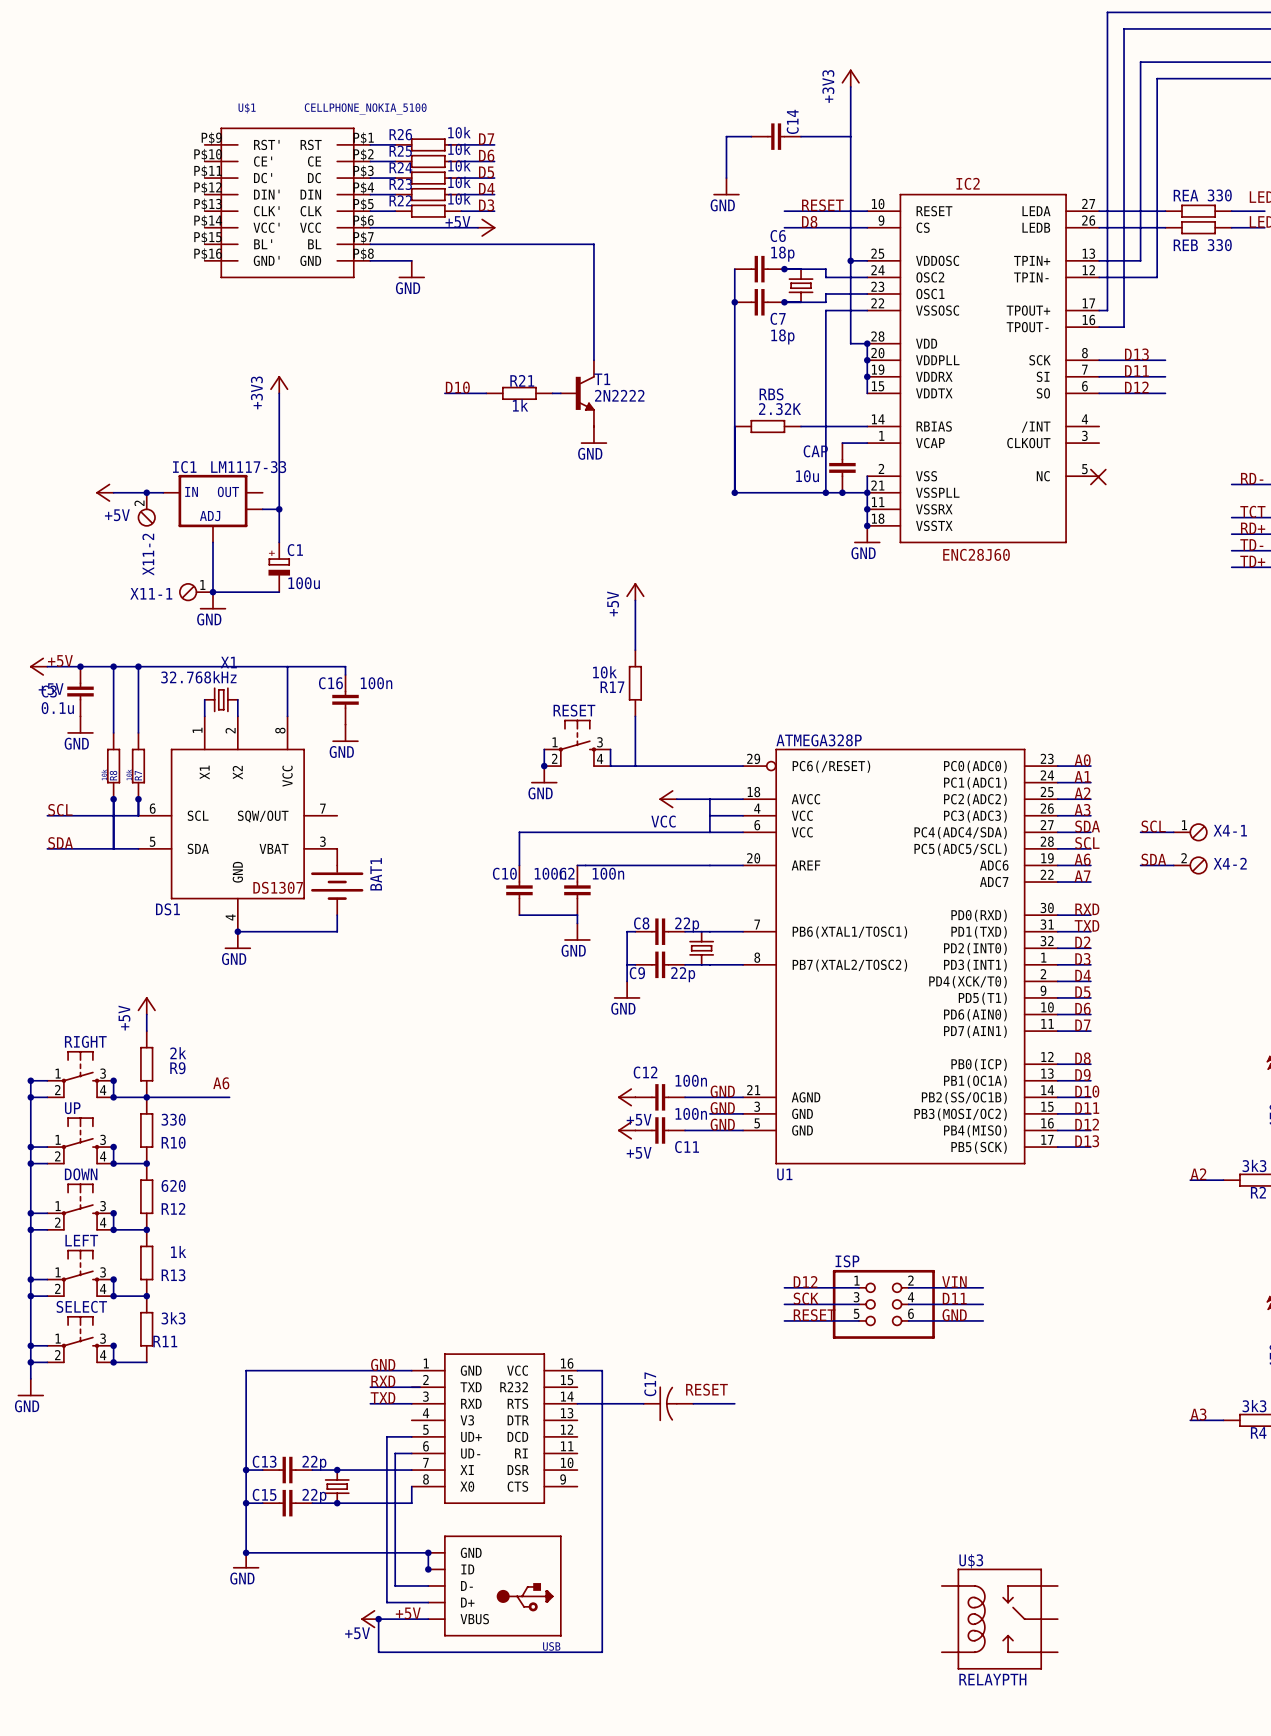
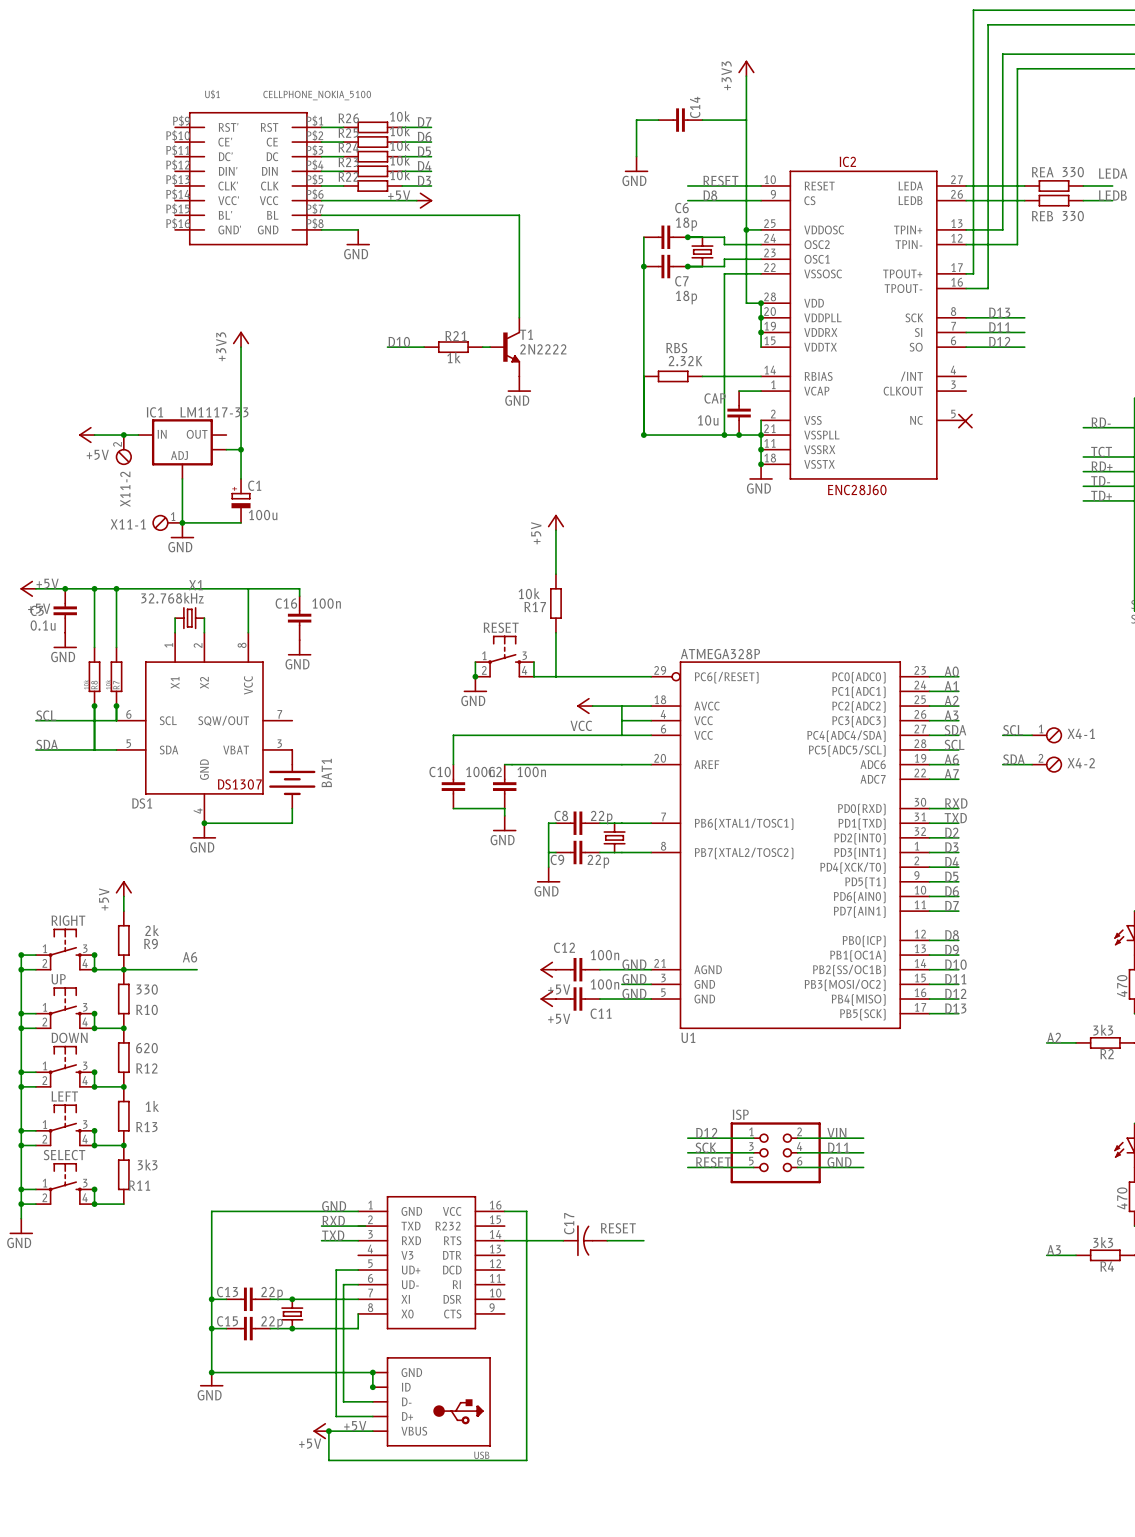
U$3: RELAYPTH (999, 1619) -> none

